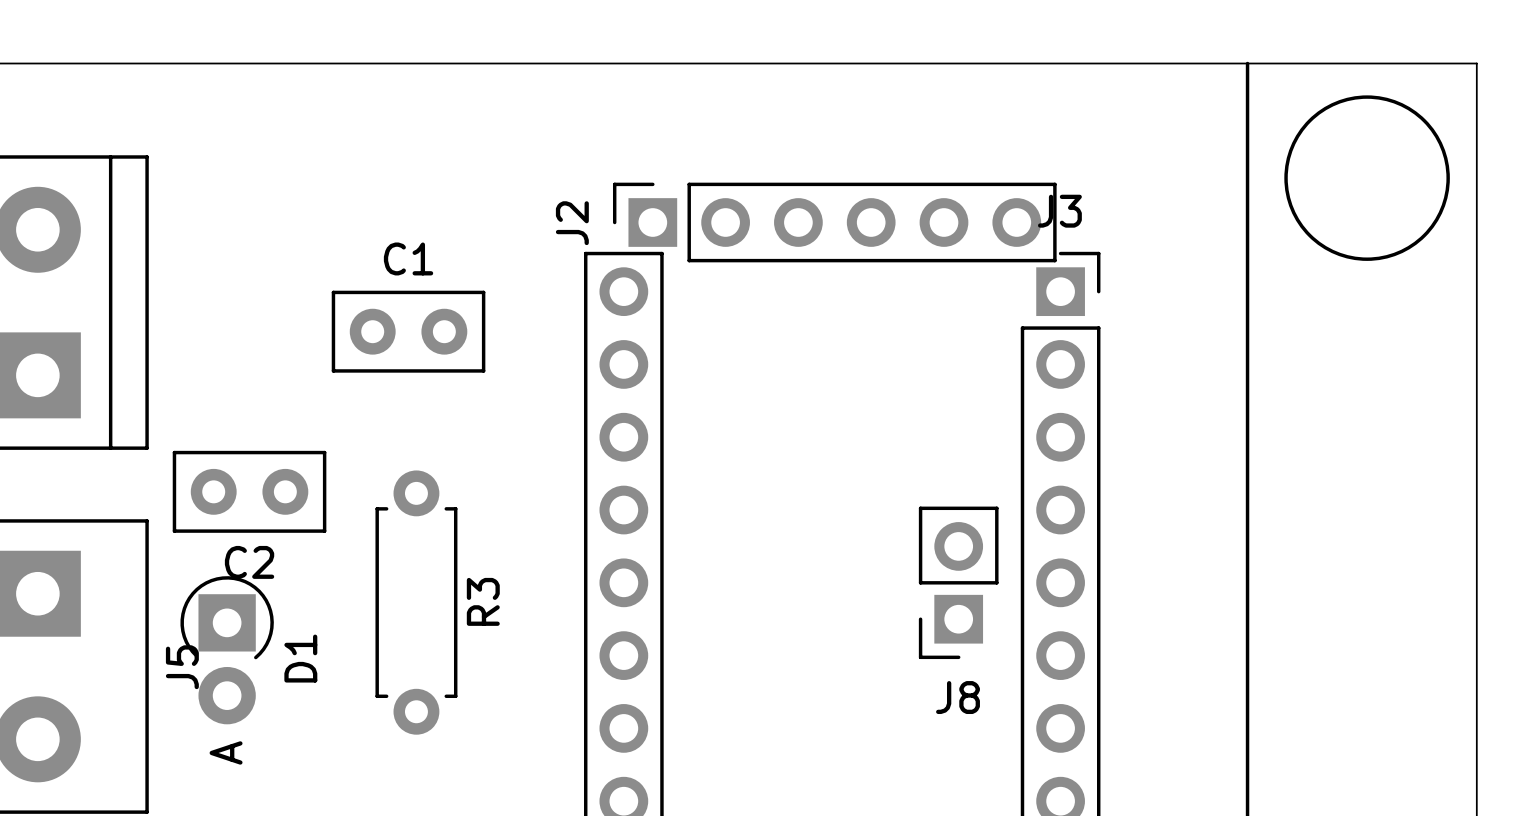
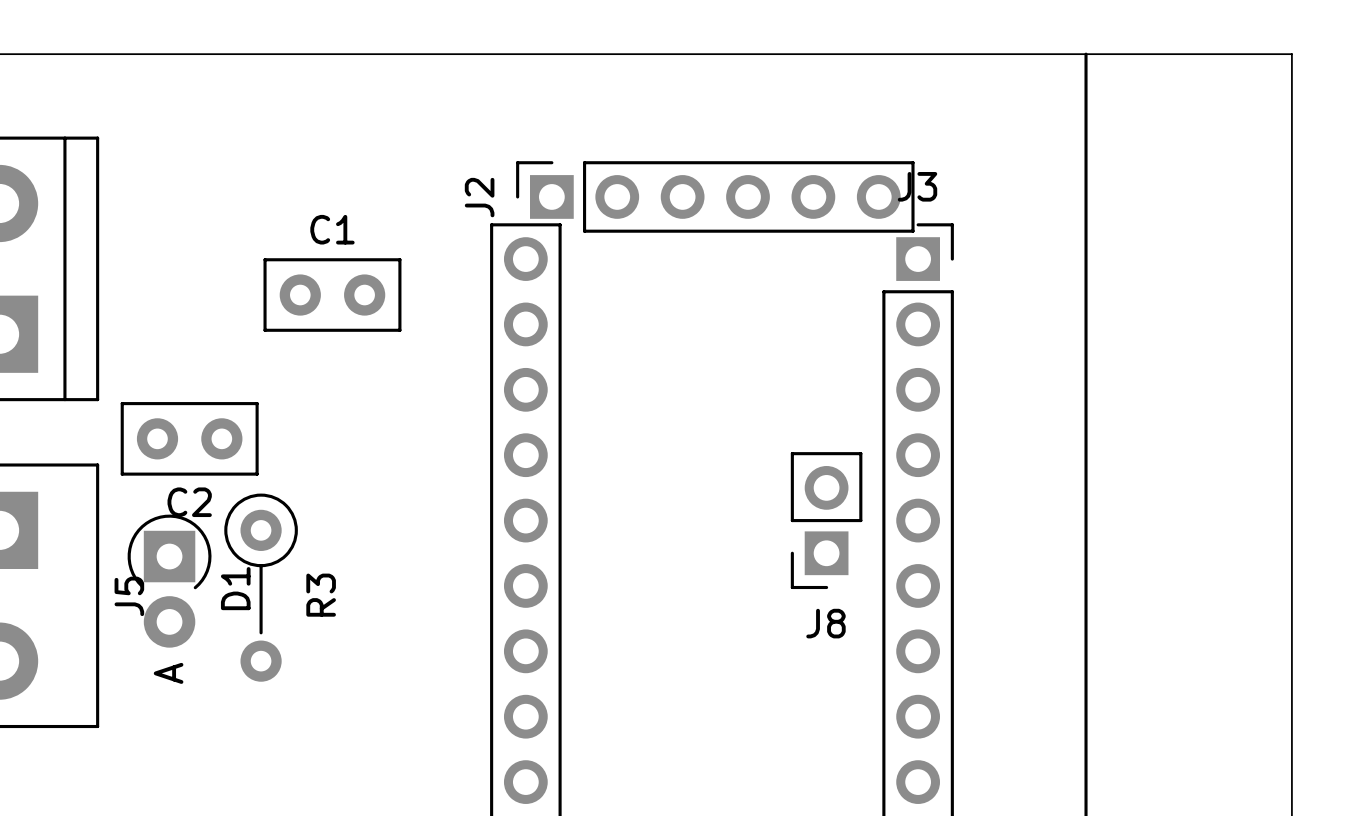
drawing: [1284, 95, 1450, 261] -> none
R3 footprint: [375, 470, 458, 735] -> [224, 493, 298, 682]

